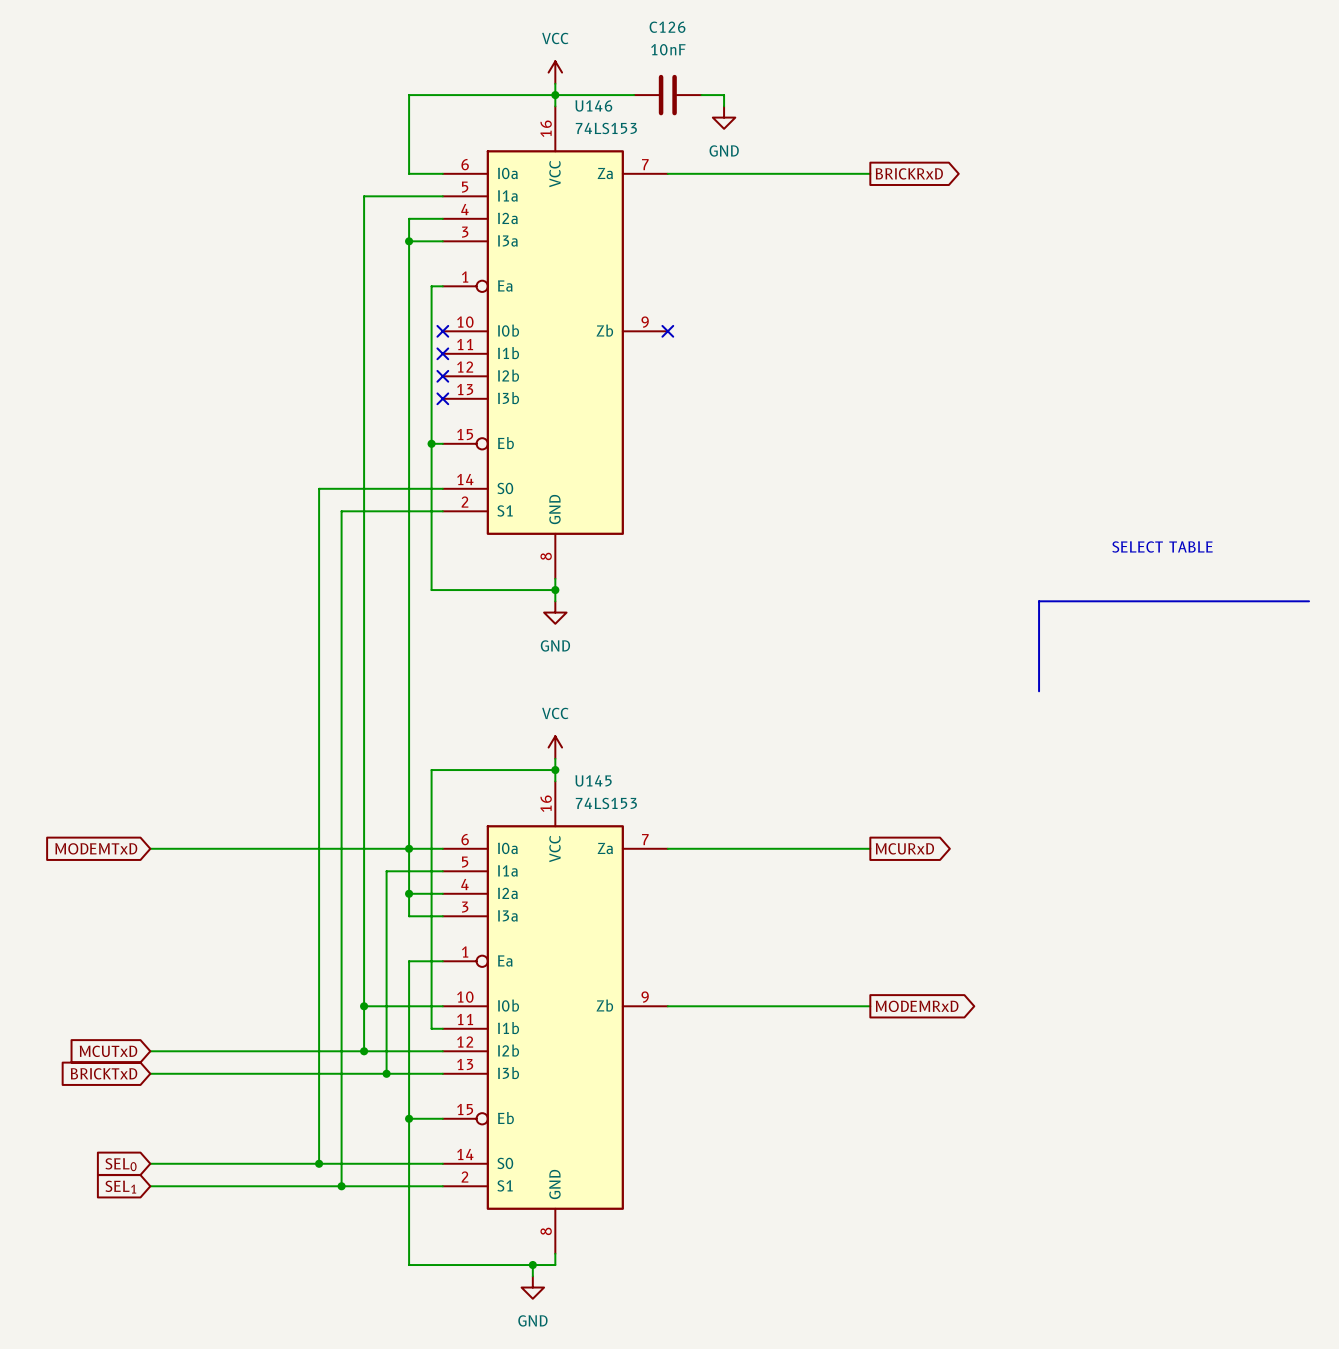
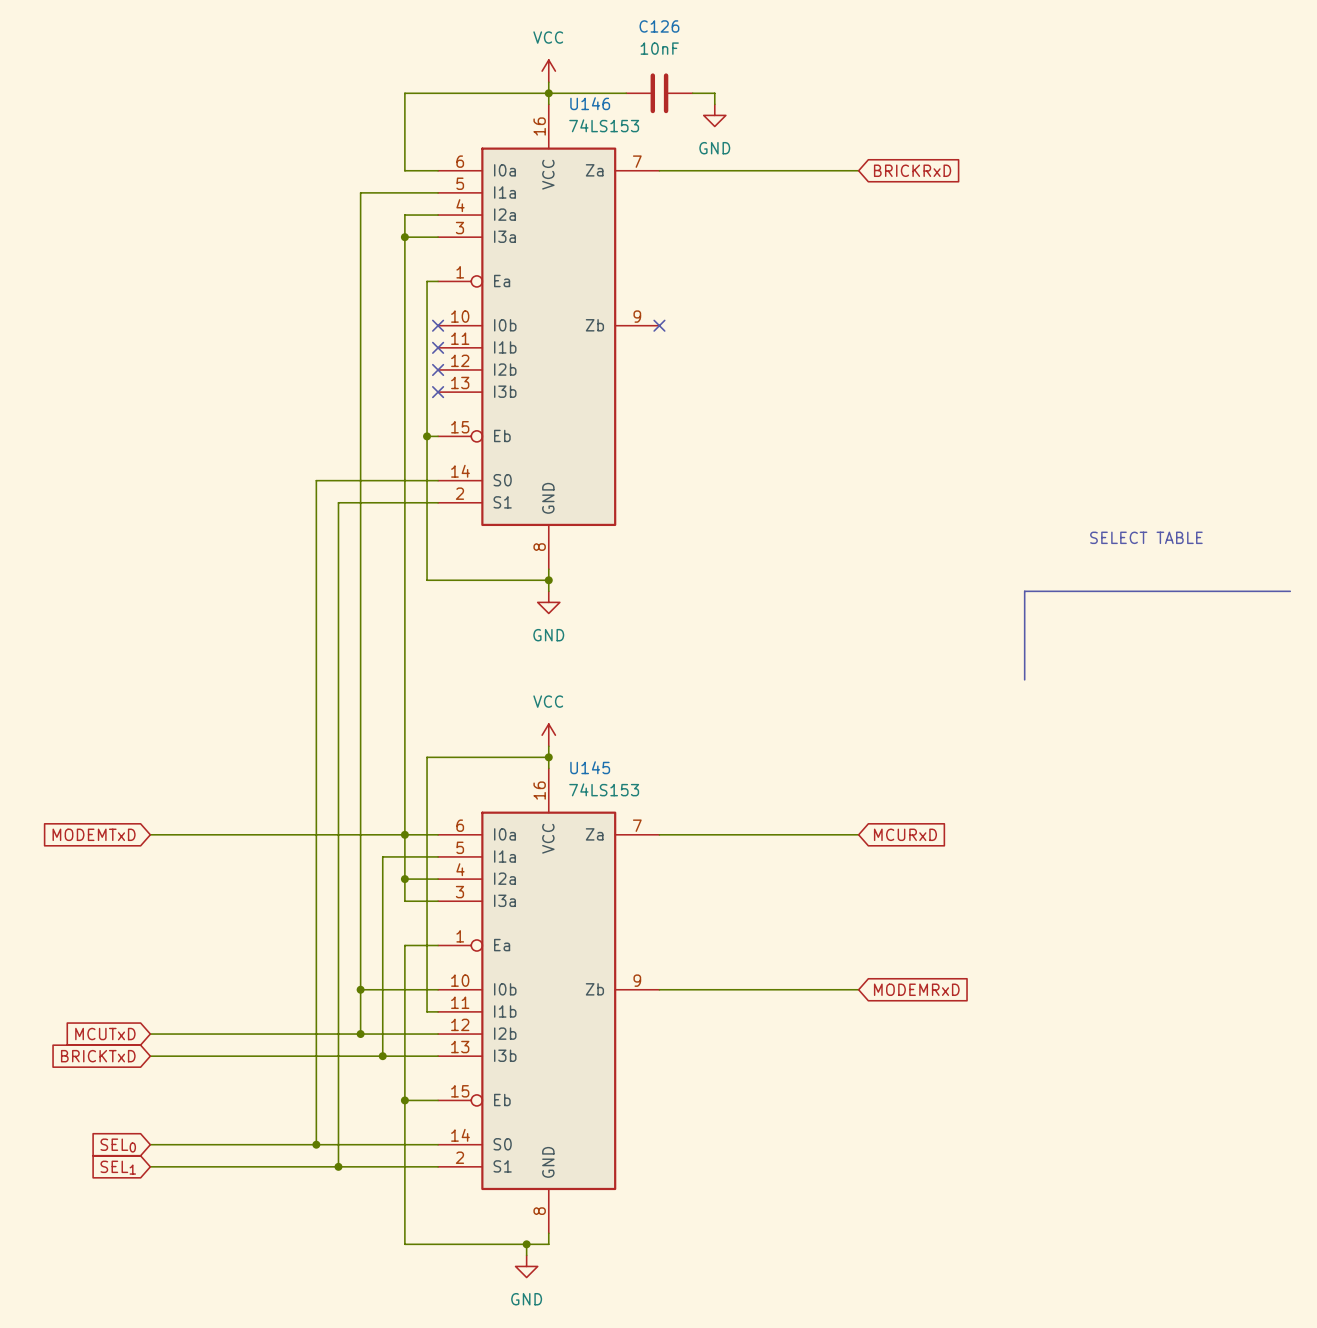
global label shape: output (909, 173) -> input (912, 170)
global label shape: output (904, 848) -> input (905, 834)
global label shape: output (917, 1006) -> input (916, 989)

